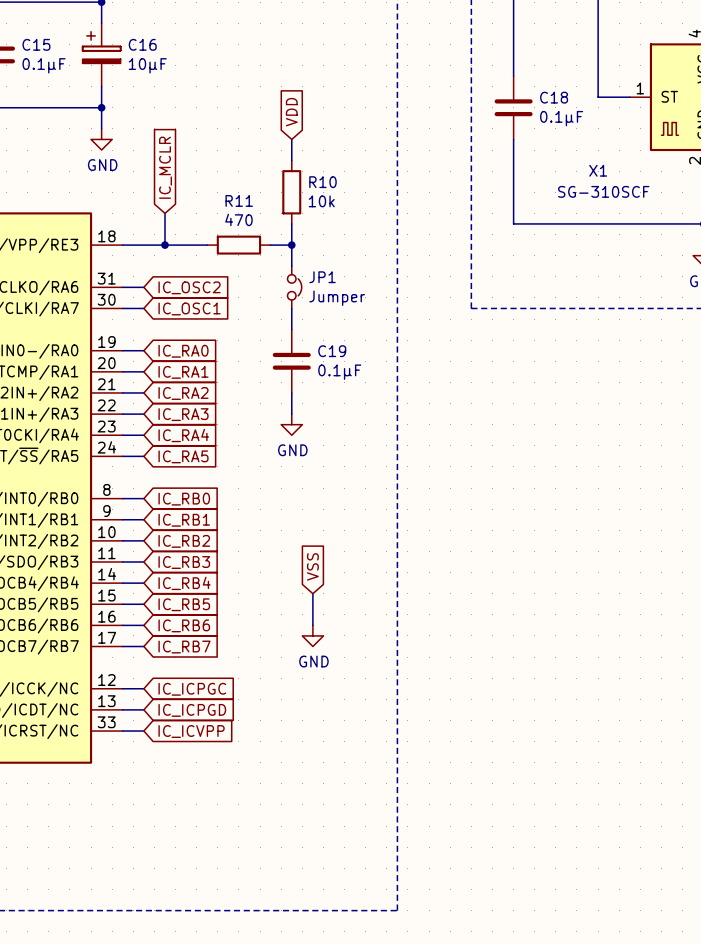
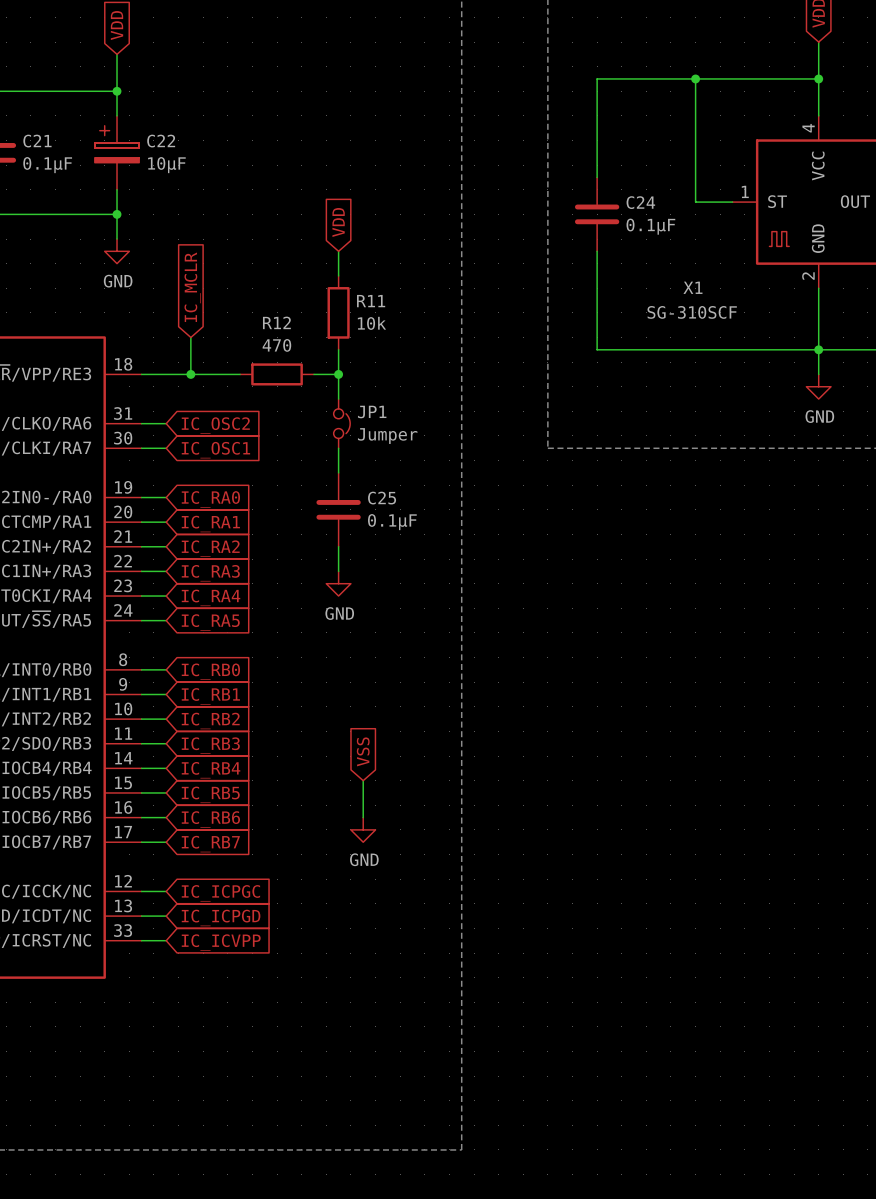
C15 name: C15 (36, 44) -> C21 (37, 141)
C16 name: C16 (142, 44) -> C22 (161, 141)
C18 name: C18 (554, 97) -> C24 (640, 202)
R10 name: R10 (322, 182) -> R11 (371, 301)
R11 name: R11 (239, 200) -> R12 (276, 322)
C19 name: C19 (332, 351) -> C25 (382, 498)

